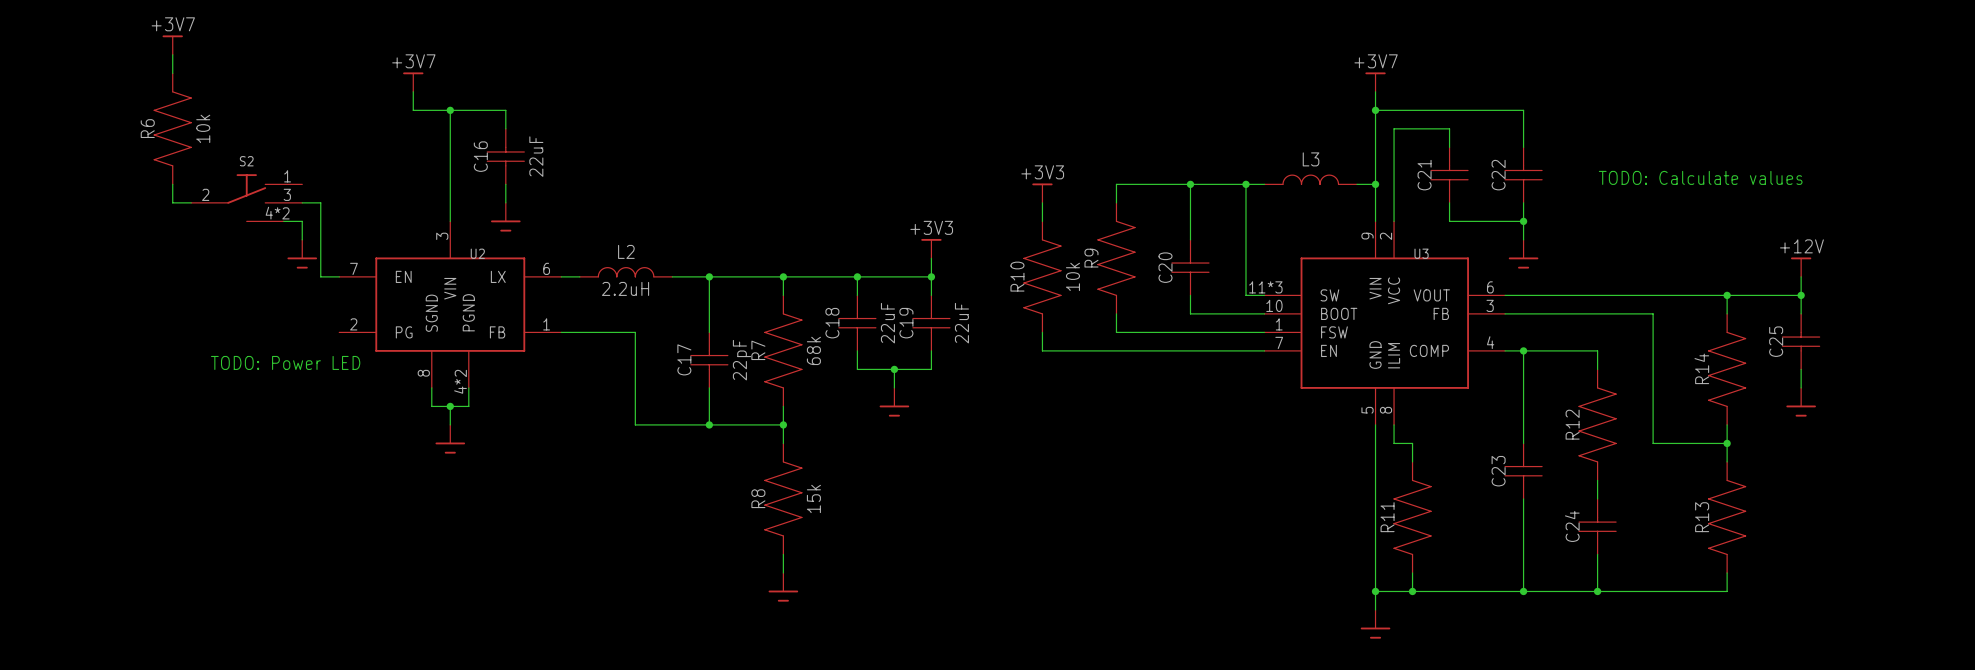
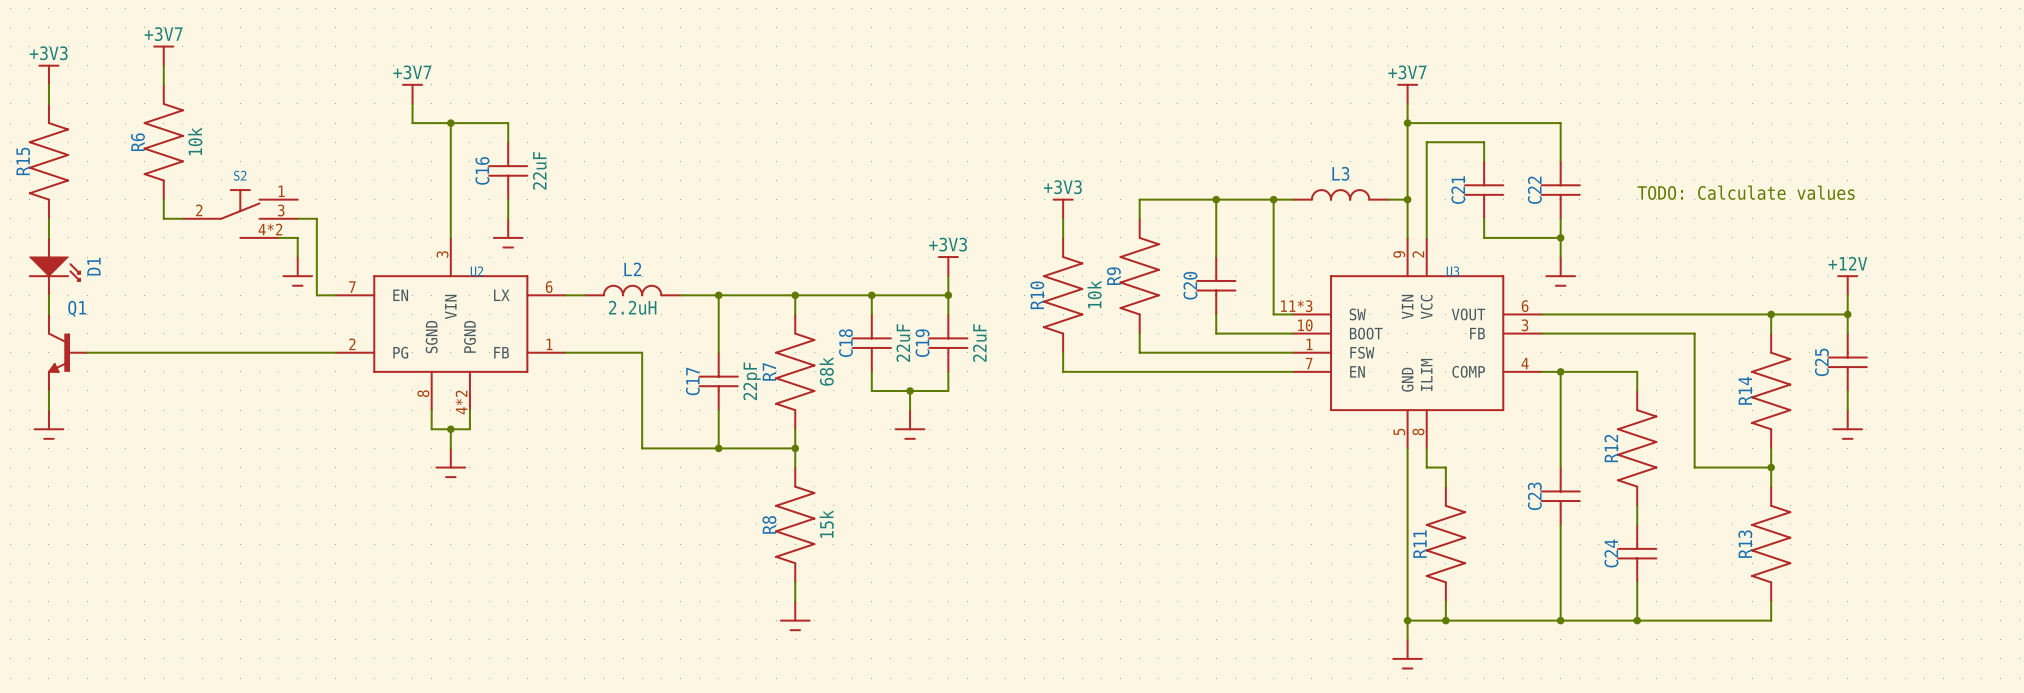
power symbol: none -> +3V3 (48, 74)
wire: none -> (48, 84) (48, 103)
R15: none -> (48, 161)
wire: none -> (48, 218) (48, 237)
D1: none -> (55, 266)
wire: none -> (48, 295) (48, 314)
Q1: none -> (67, 352)
wire: none -> (87, 352) (335, 352)
text: TODO: Power LED (285, 362) -> none
wire: none -> (48, 390) (48, 410)
power symbol: none -> (48, 424)

